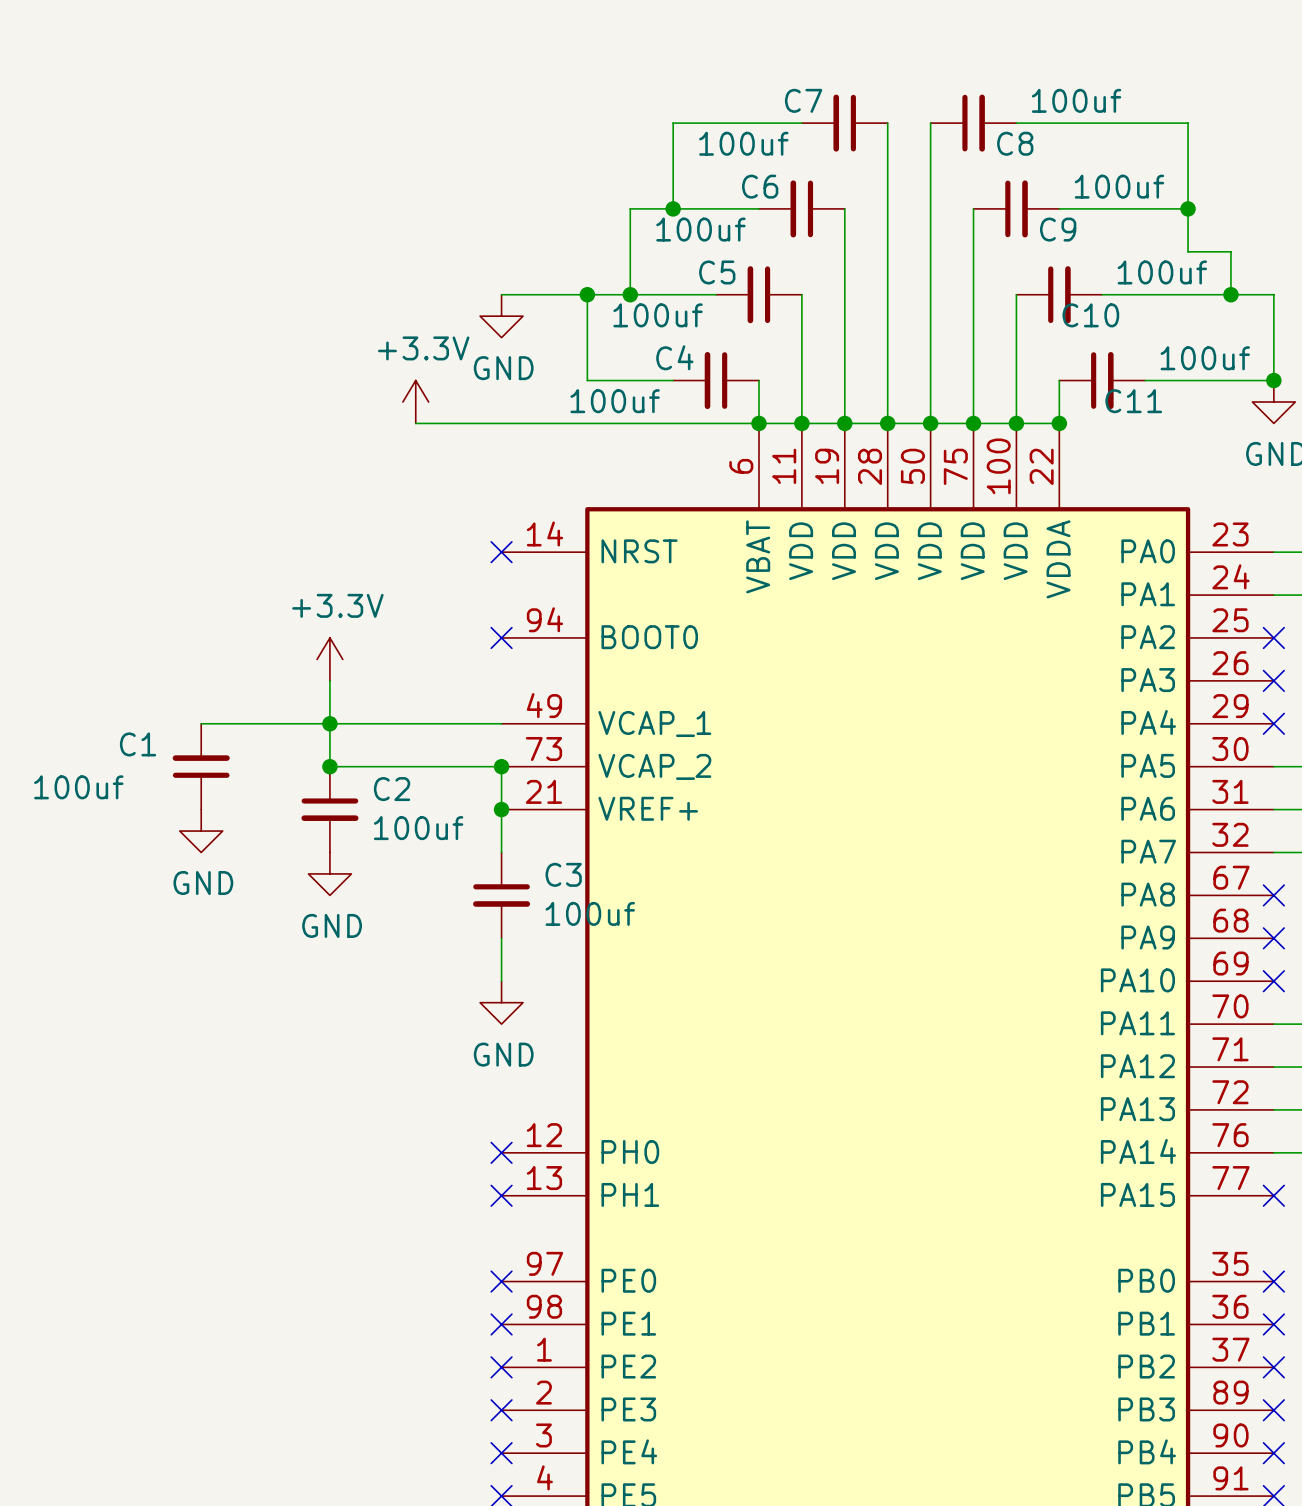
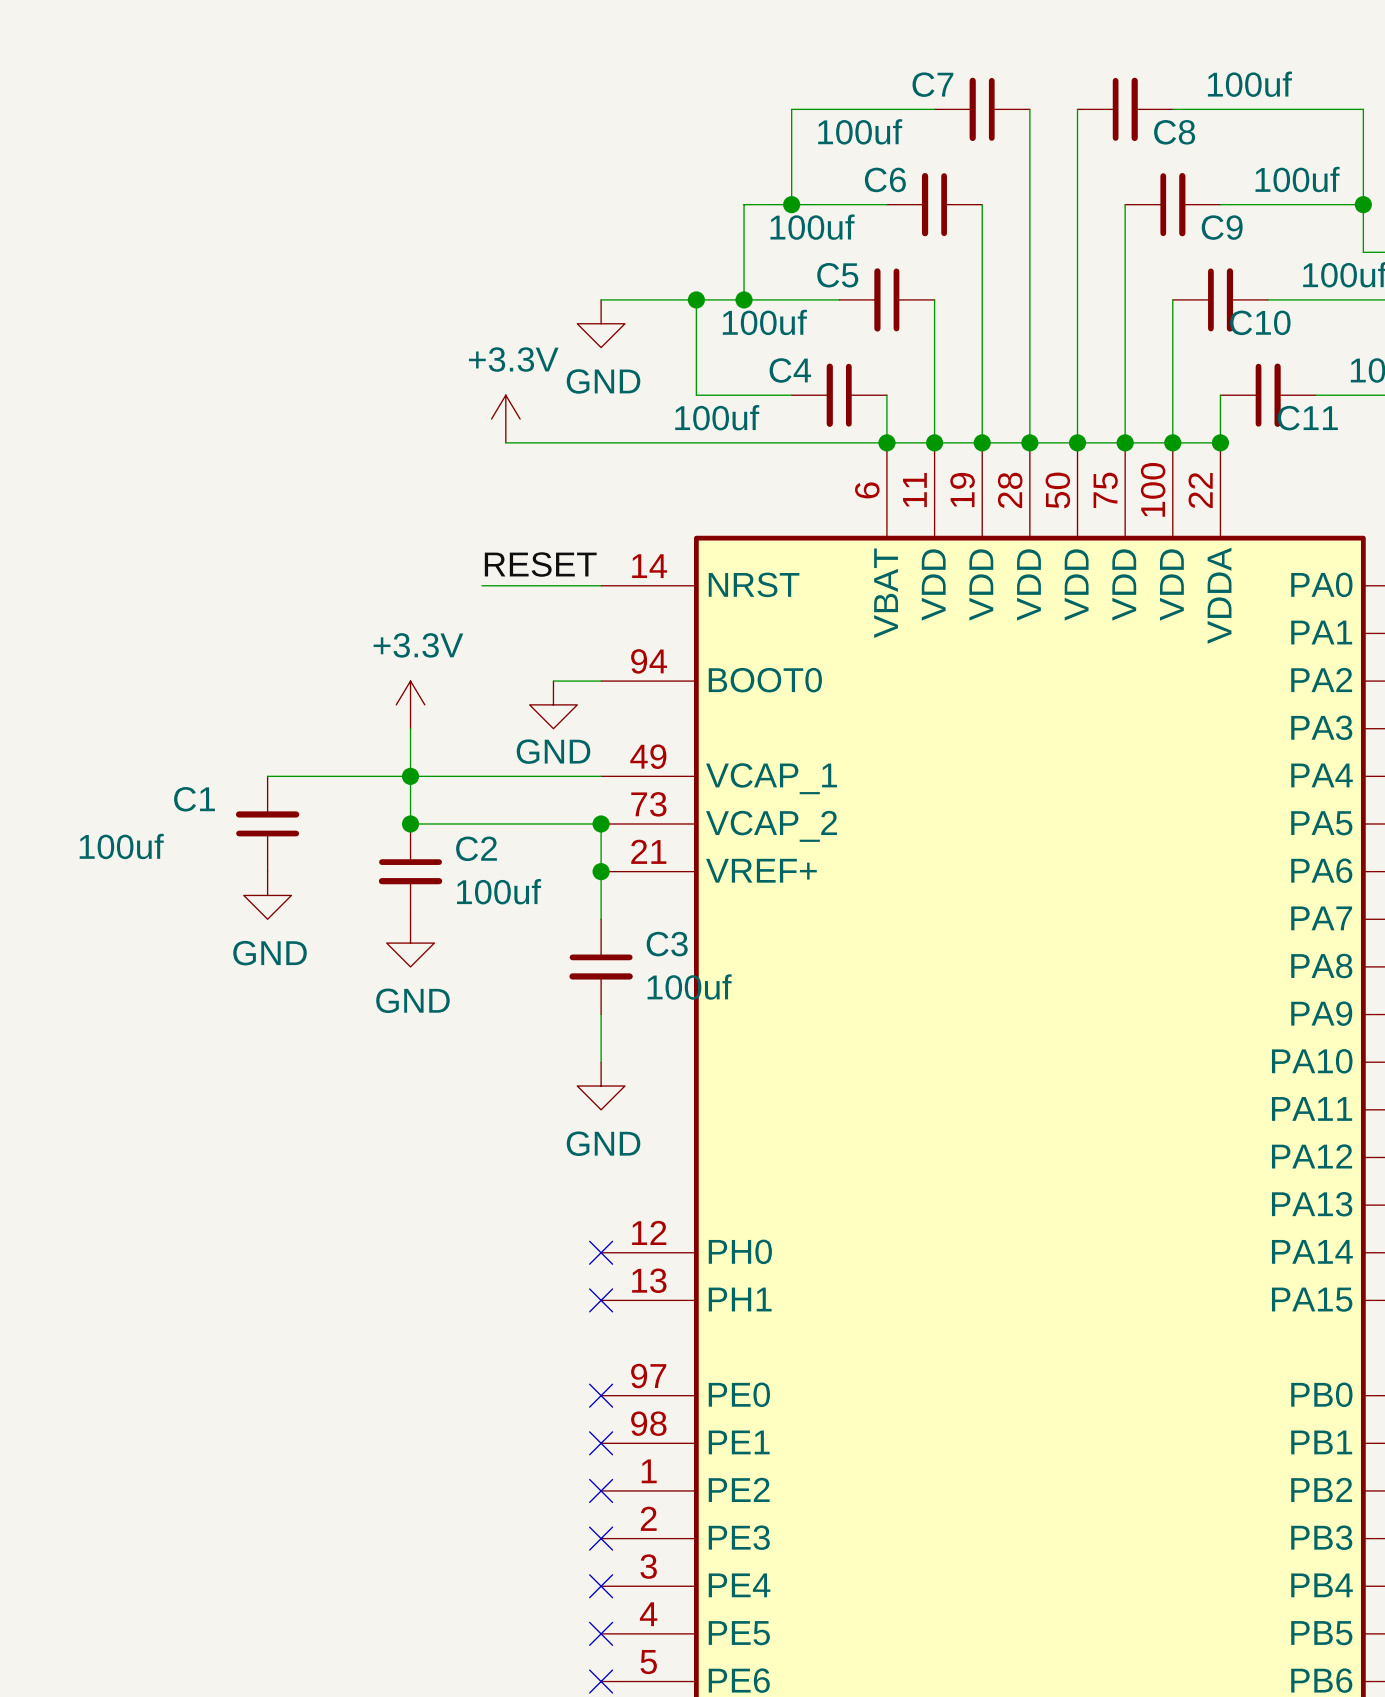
label: none -> RESET (540, 564)
wire: none -> (482, 585) (601, 585)
no-connect mark: (501, 552) -> none
wire: none -> (553, 681) (601, 681)
no-connect mark: (501, 637) -> none
power symbol: none -> GND (553, 704)

